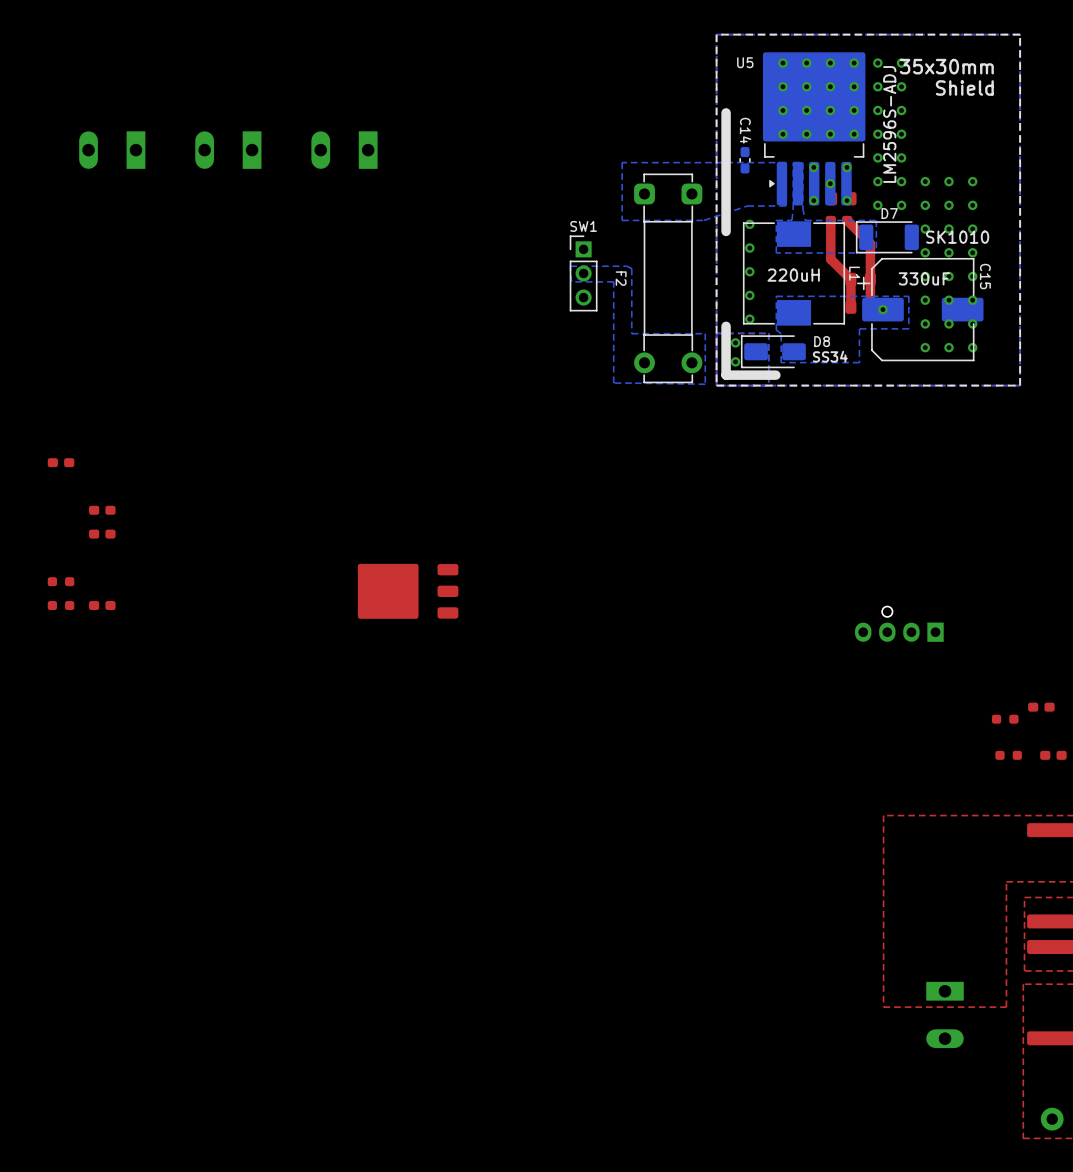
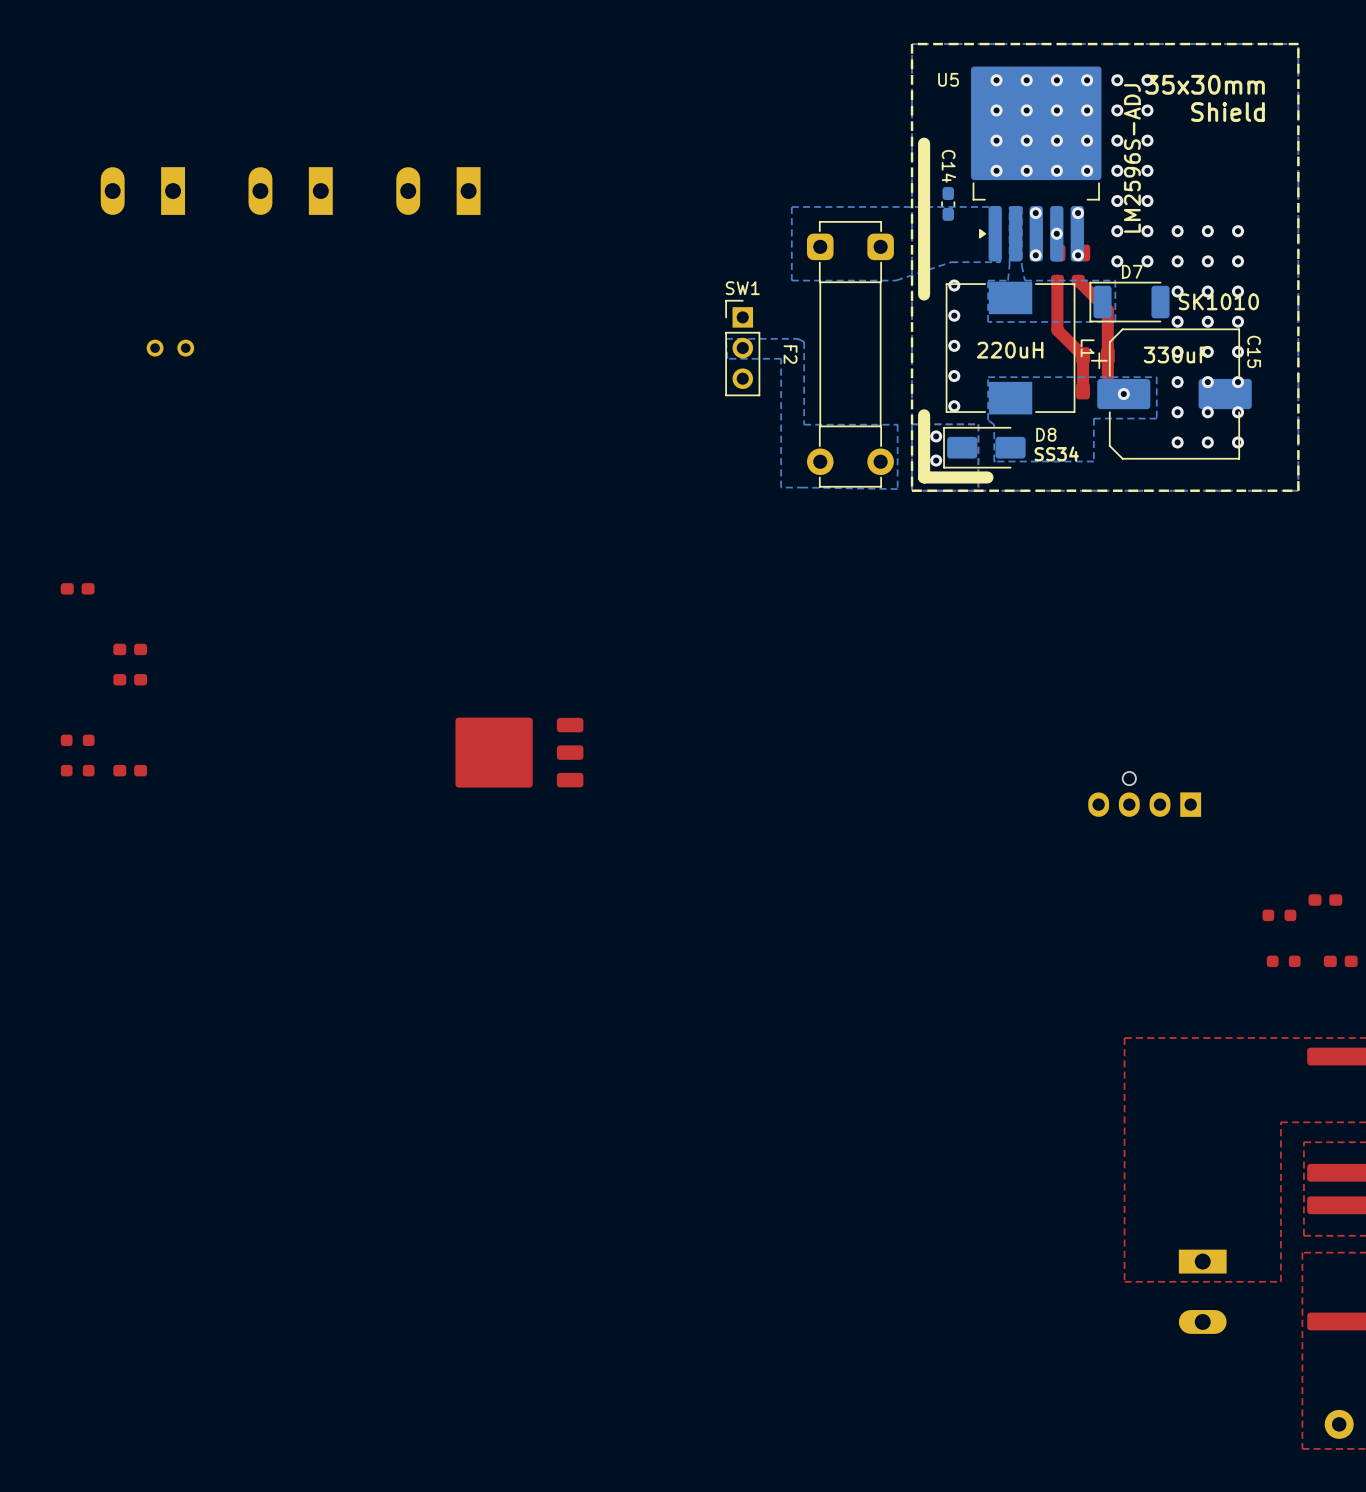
part: none -> (170, 348)

